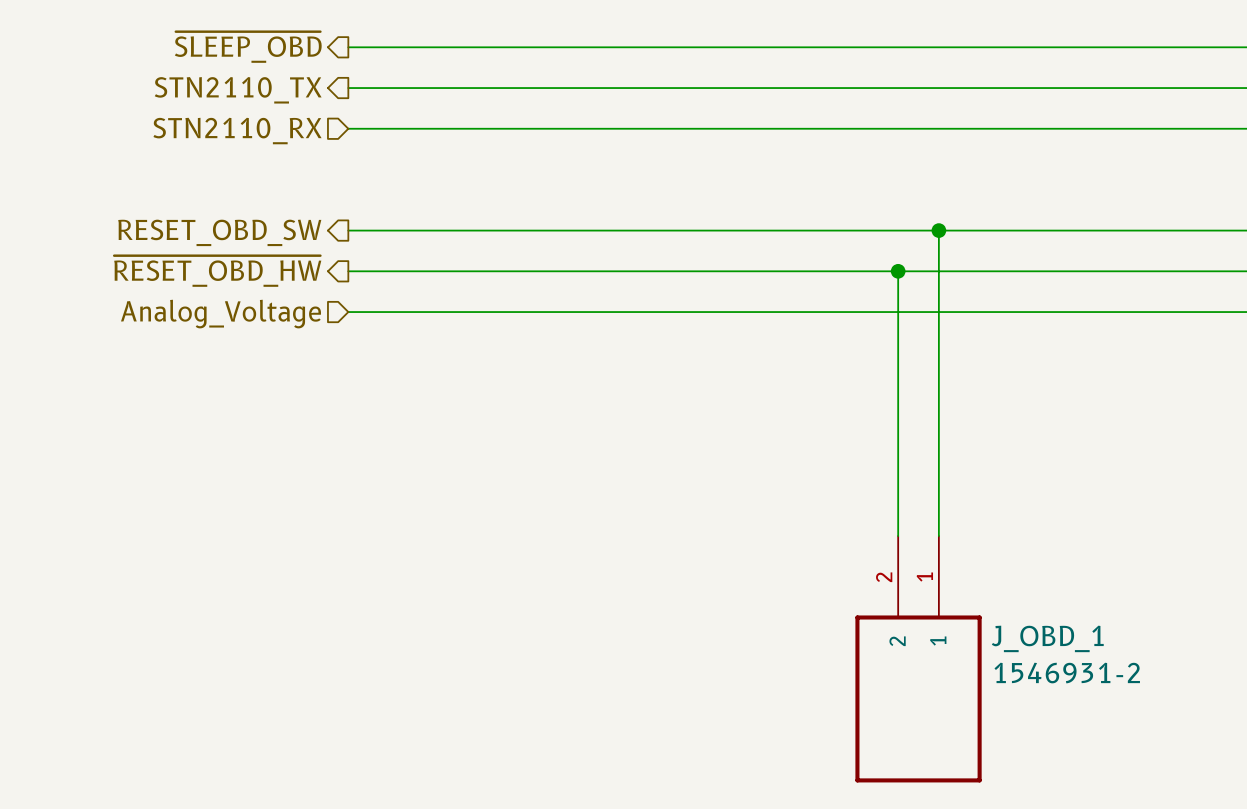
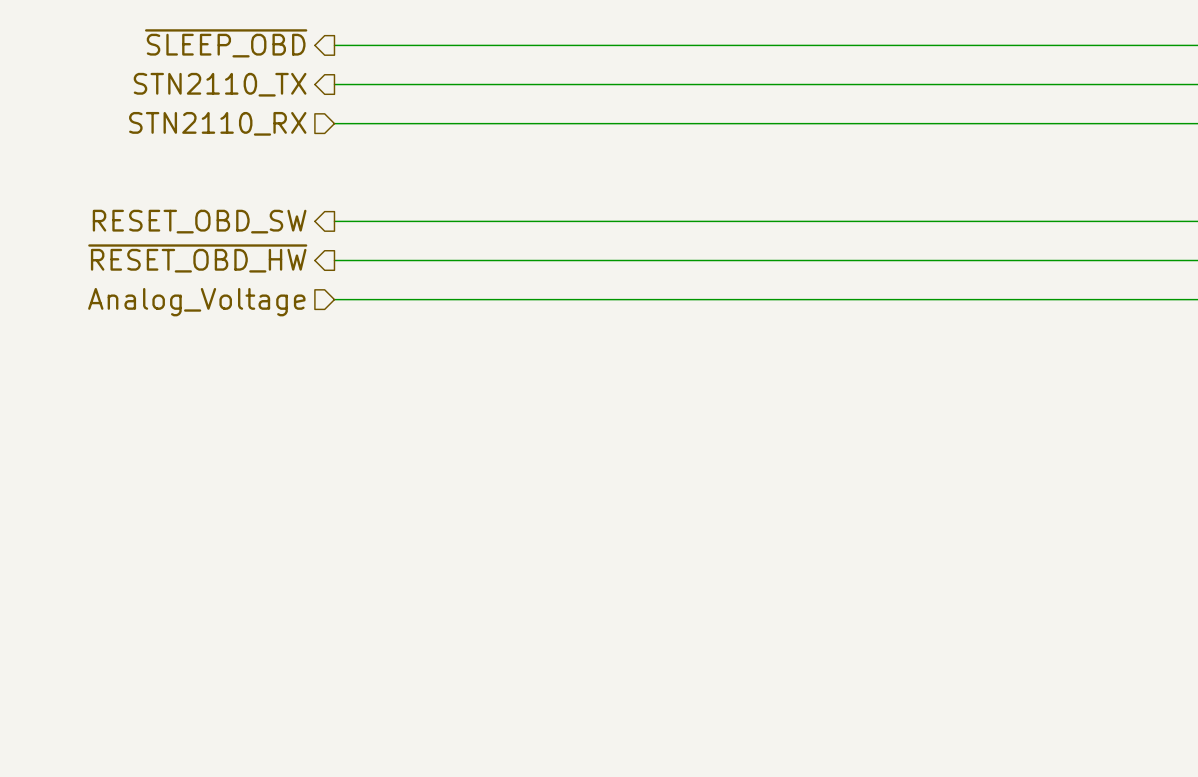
wire: (938, 230) (938, 536) -> none
junction: (938, 230) -> none
wire: (898, 271) (898, 536) -> none
junction: (898, 271) -> none
J_OBD_1: 1546931-2 (918, 659) -> none

